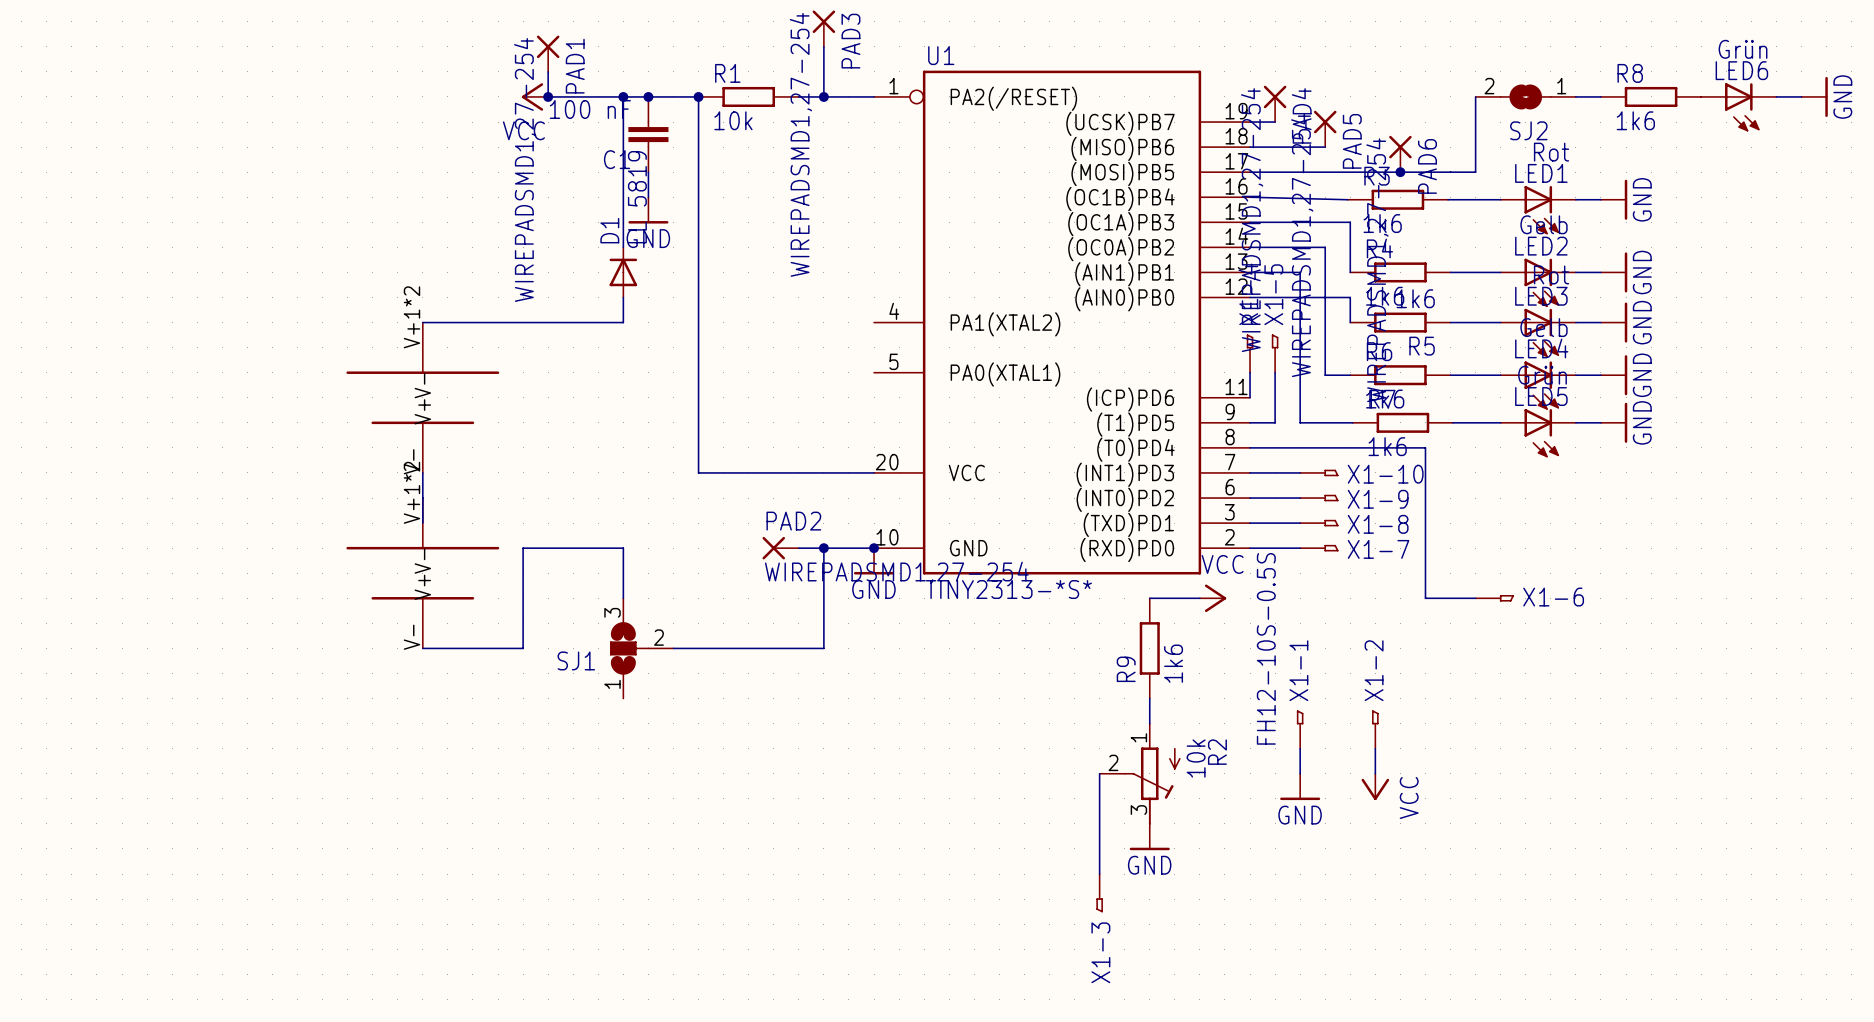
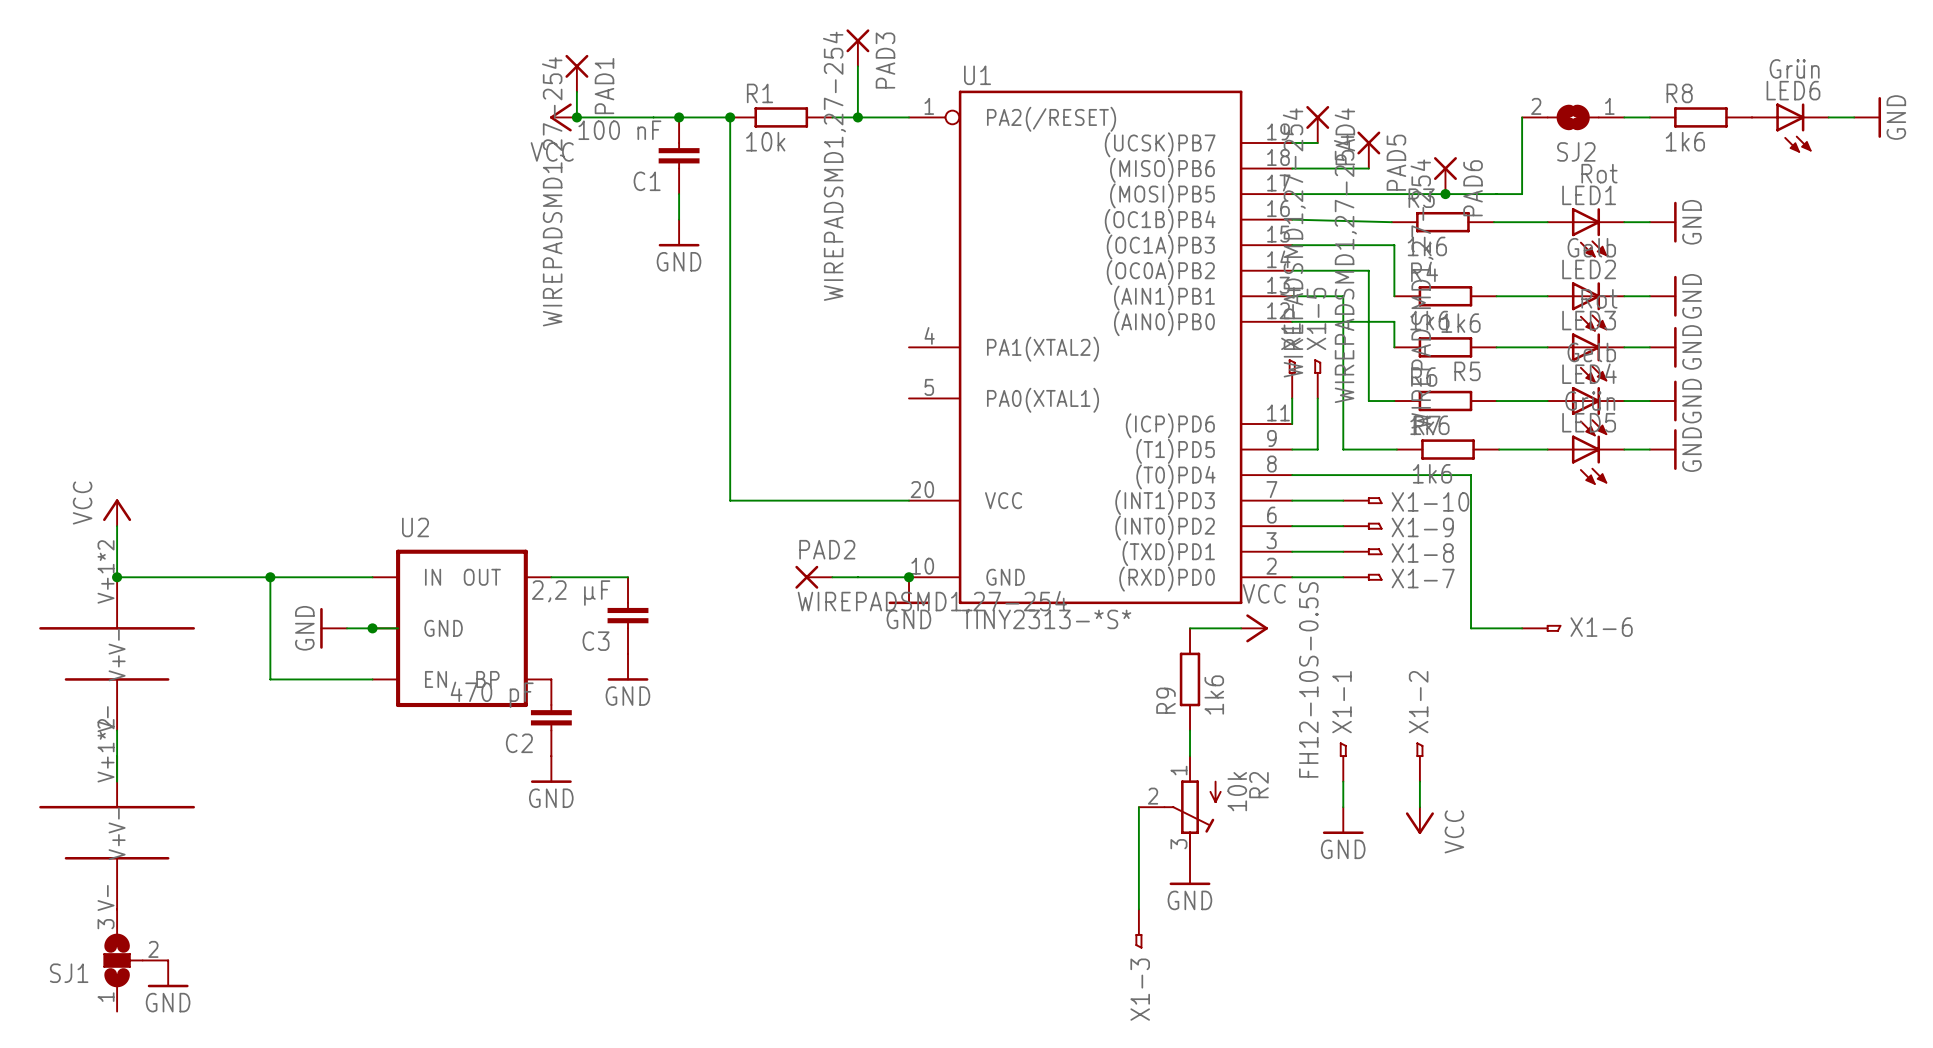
wire: (623, 96) (623, 247) -> none
junction: (623, 96) -> none
D1: LL 5819 (623, 272) -> none
wire: (623, 297) (623, 322) (422, 322) -> none
part: (422, 397) -> none
wire: (422, 472) (422, 523) -> none
power symbol: none -> VCC (117, 512)
wire: none -> (117, 526) (117, 577) (372, 577)
junction: none -> (117, 577)
wire: none -> (270, 577) (270, 679) (372, 679)
junction: none -> (270, 577)
wire: (523, 548) (523, 648) (422, 648) -> none
wire: (598, 548) (623, 548) (623, 598) -> none
wire: (823, 548) (823, 648) (673, 648) -> none
junction: (823, 548) -> none
part: (422, 573) -> none
C3: none -> 2,2 µF (628, 615)
power symbol: none -> GND (333, 628)
wire: none -> (347, 628) (398, 628)
junction: none -> (372, 628)
U2: none -> (461, 628)
part: none -> (117, 653)
power symbol: none -> GND (628, 667)
SJ1 position: (641, 648) -> (135, 960)
C2: none -> 470 pF (551, 717)
wire: none -> (117, 730) (117, 781)
power symbol: none -> GND (551, 769)
part: none -> (117, 832)
power symbol: none -> GND (168, 973)

